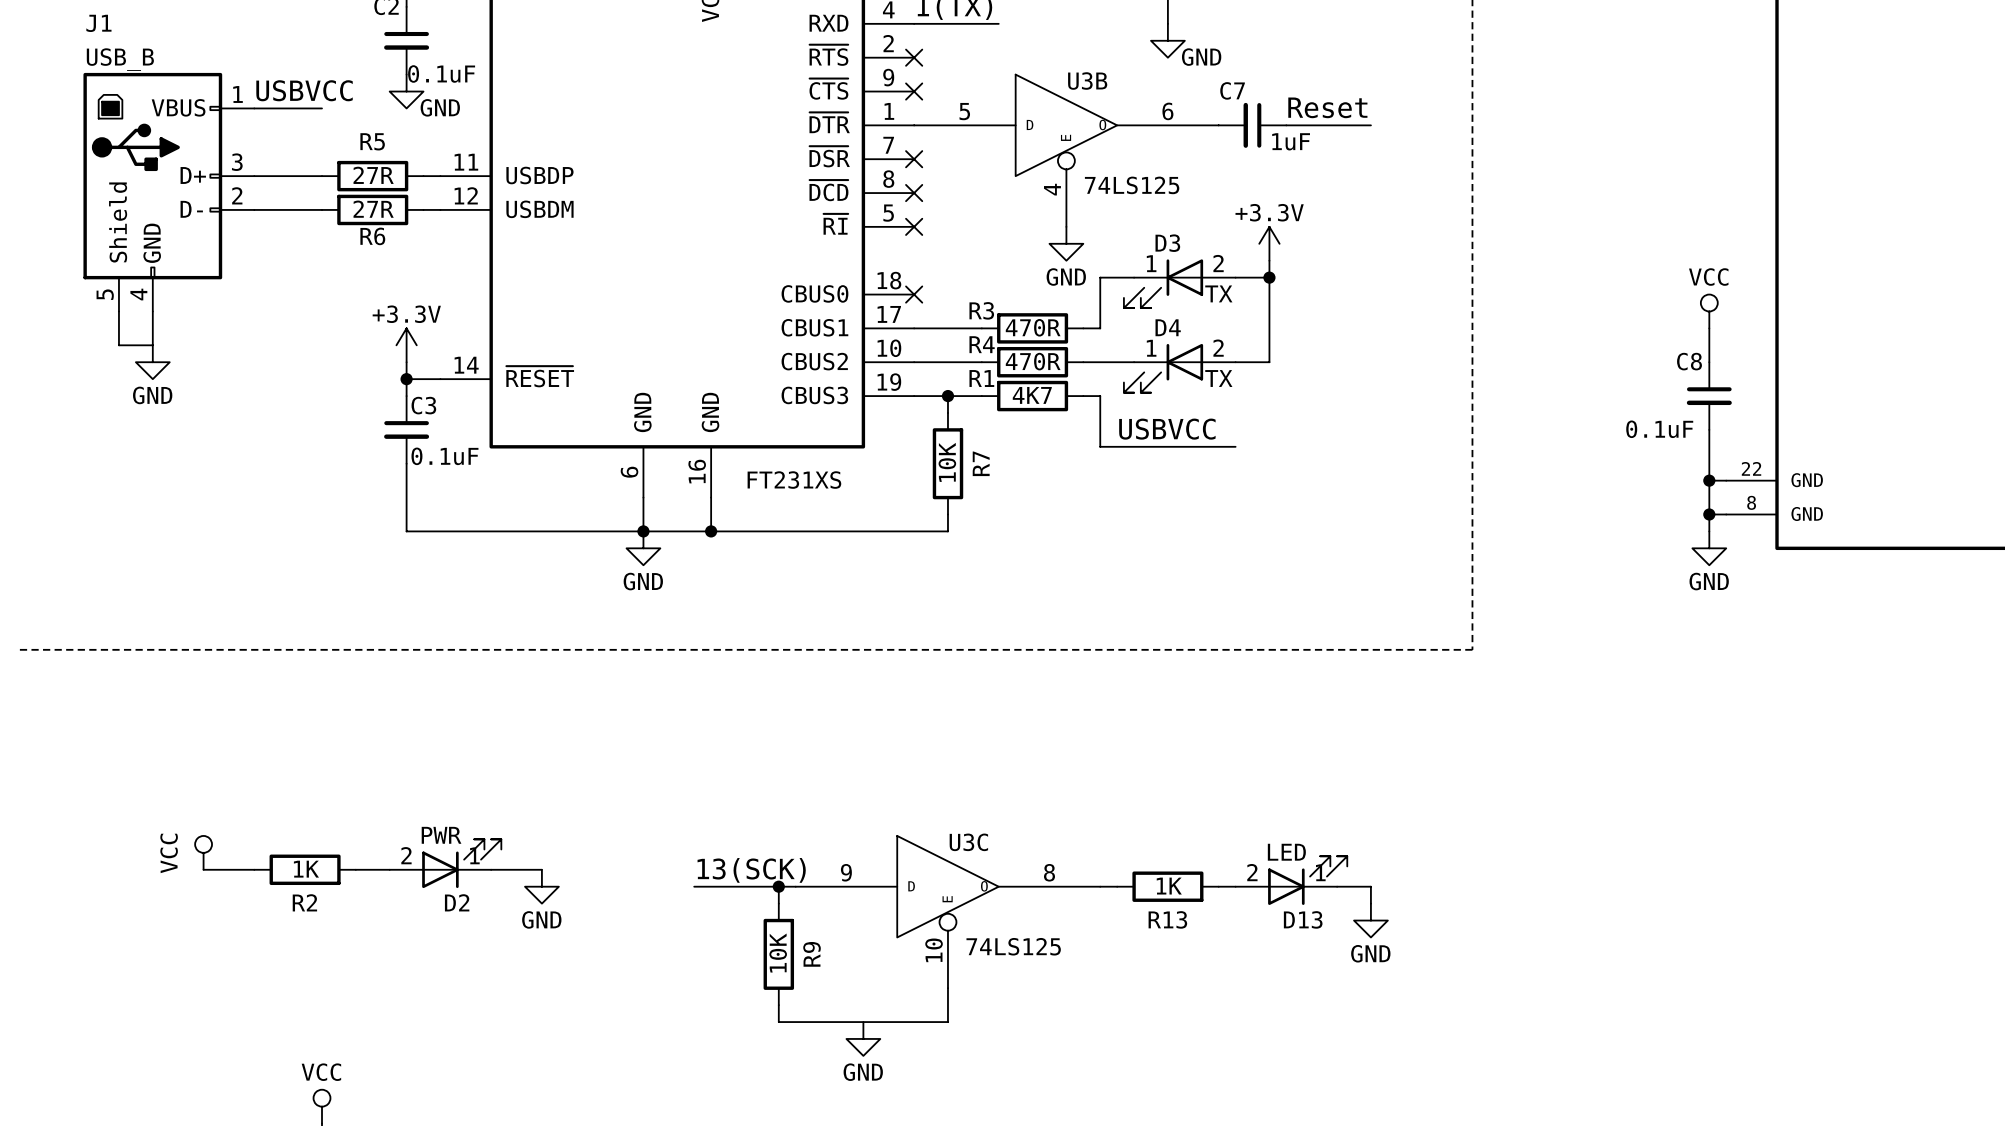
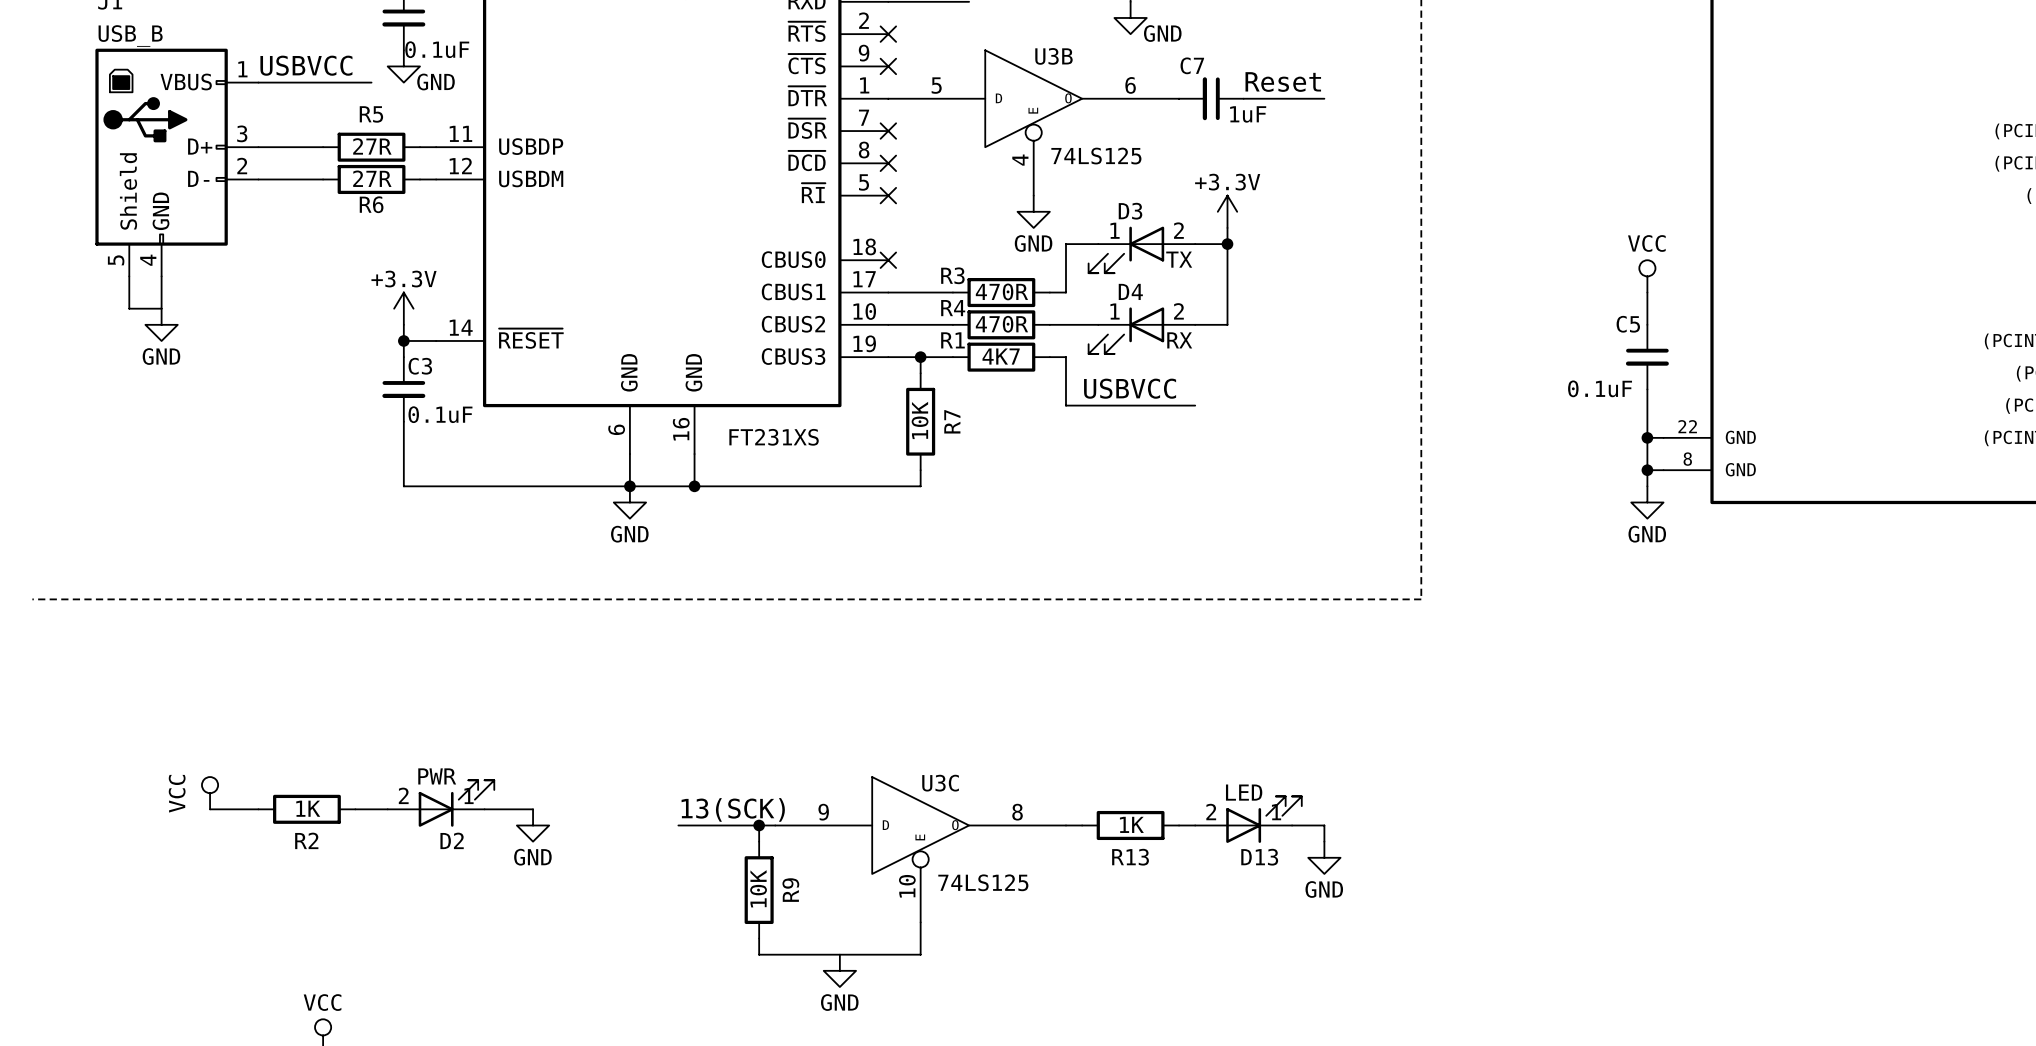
wire: none -> (323, 82) (371, 82)
C8 name: C8 (1689, 361) -> C5 (1628, 324)
D4 value: TX (1218, 378) -> RX (1179, 340)

